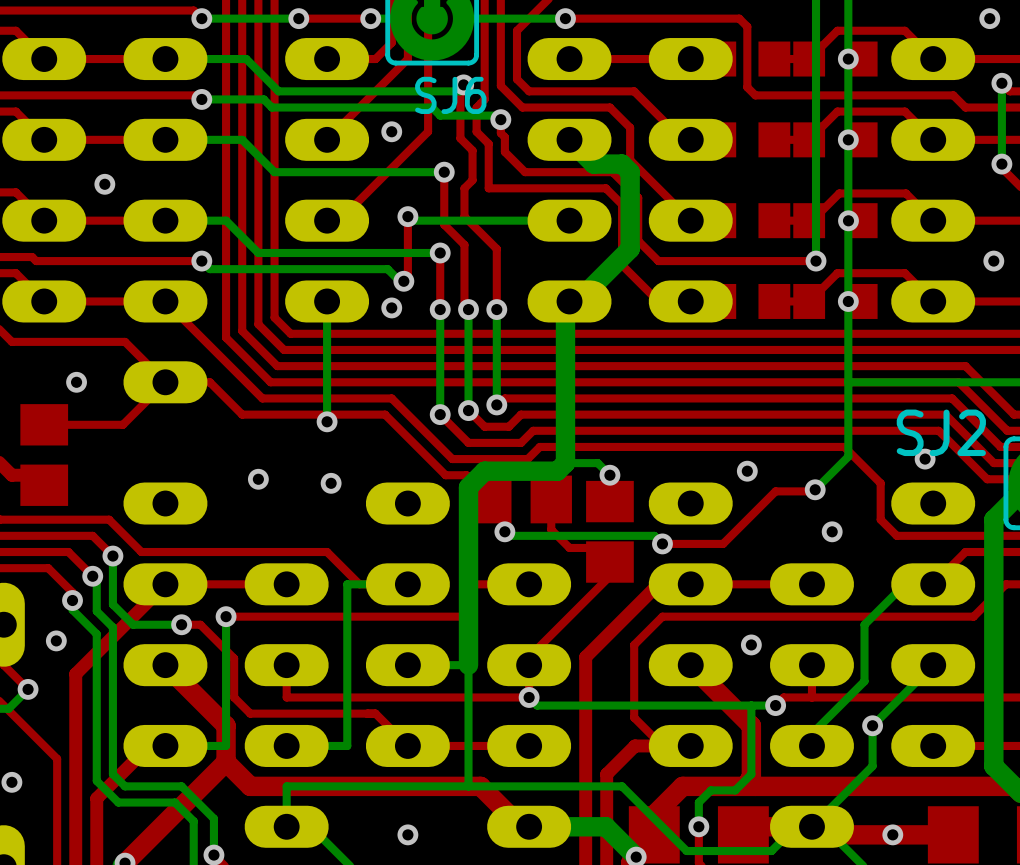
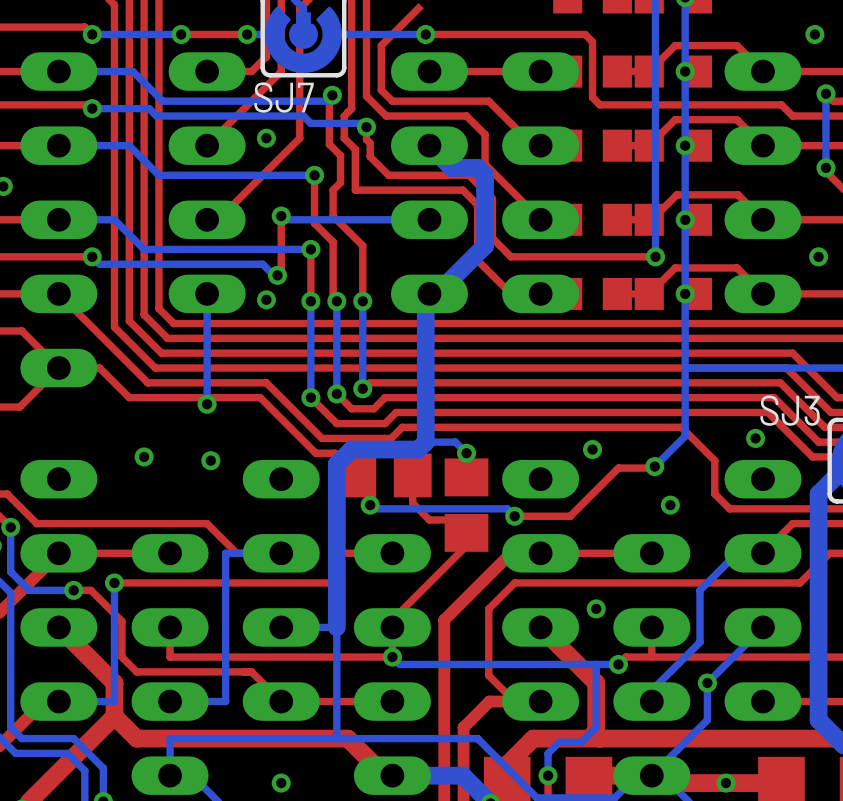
SJ6 name: SJ6 (450, 95) -> SJ7 (284, 97)
SJ2 name: SJ2 (941, 432) -> SJ3 (790, 410)

